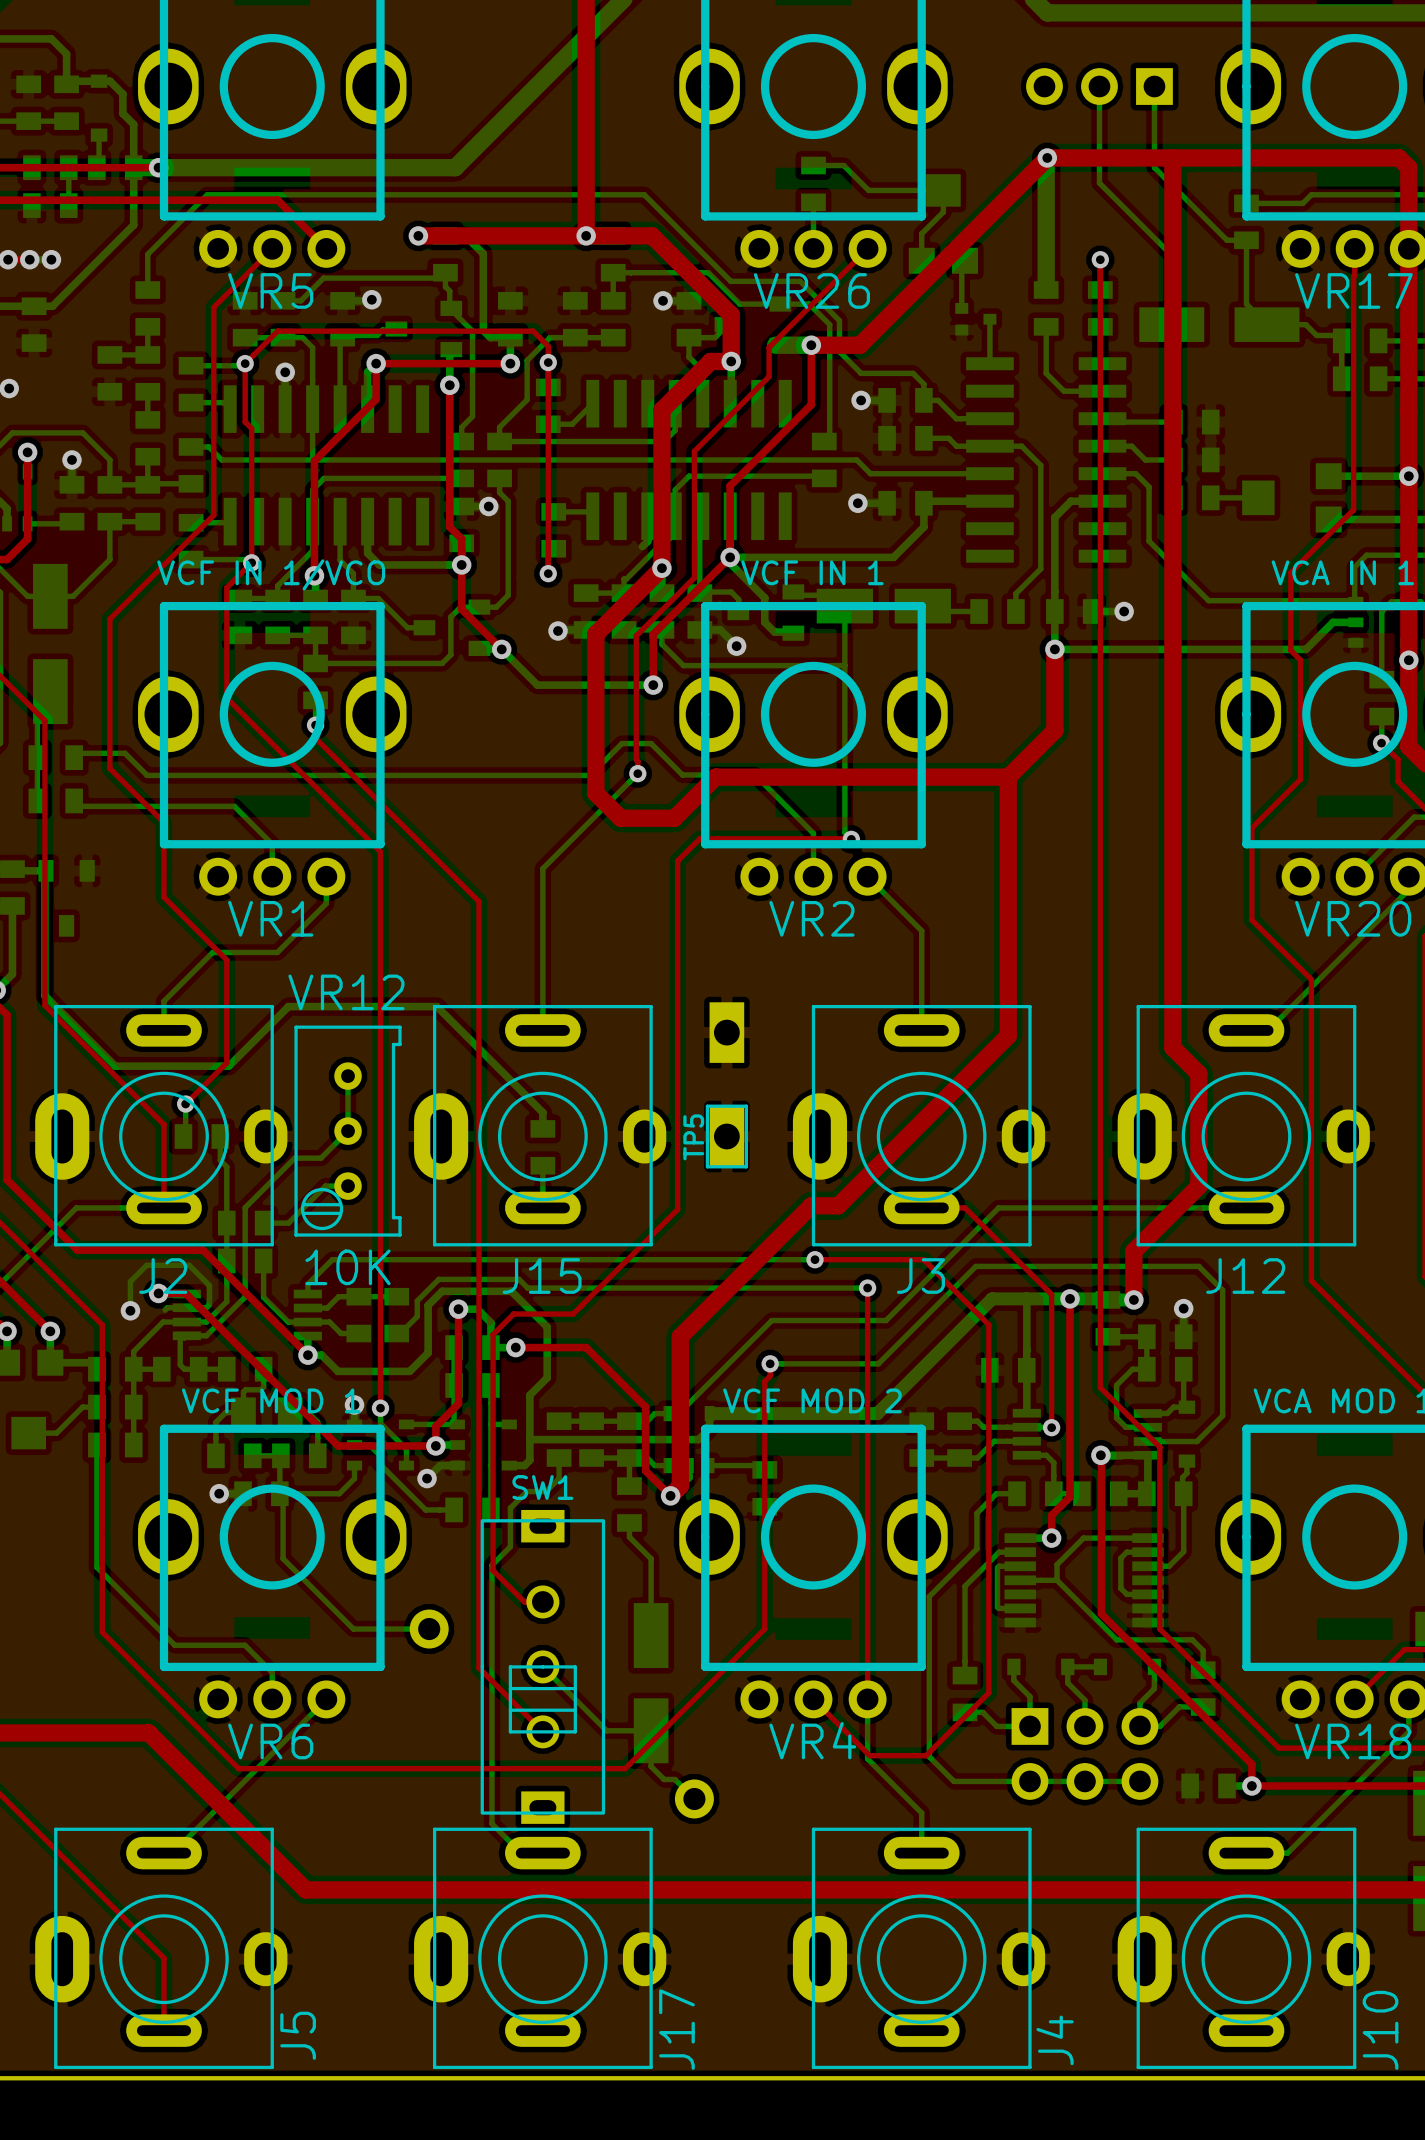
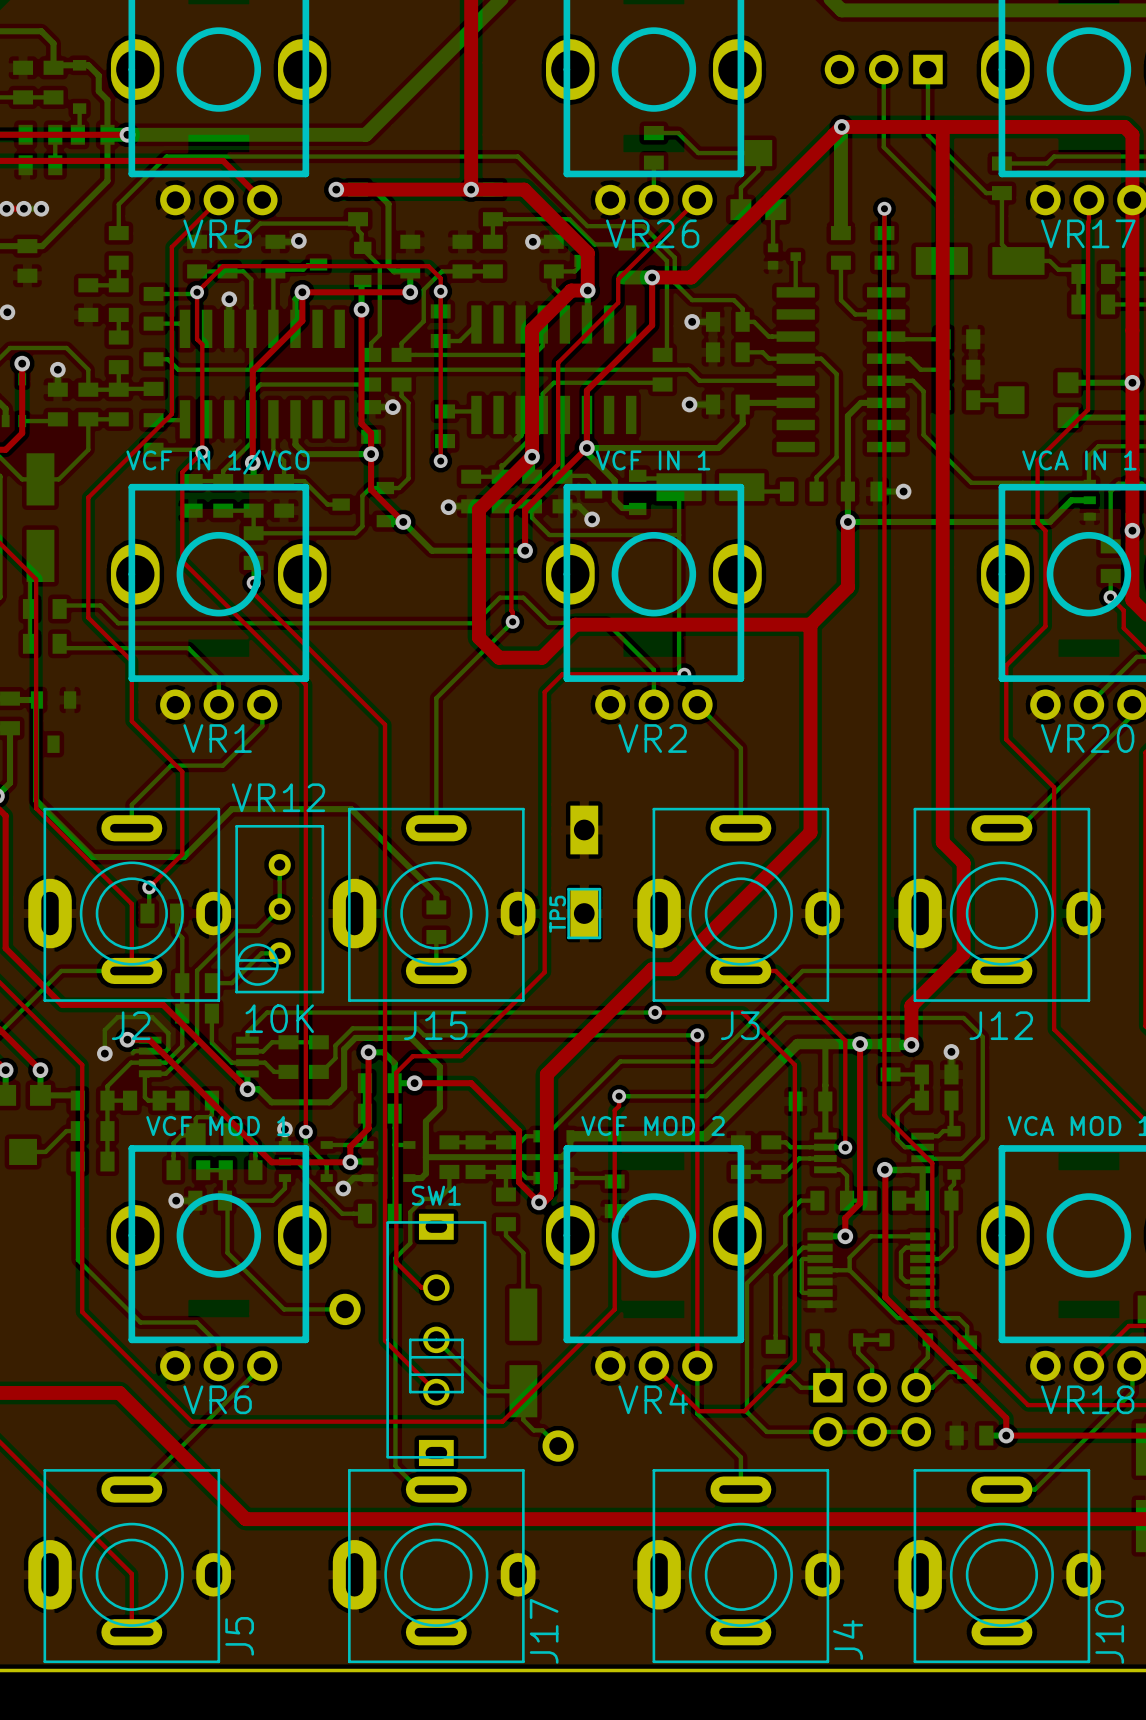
VR12 footprint: [294, 1025, 402, 1237] -> [235, 825, 325, 994]

